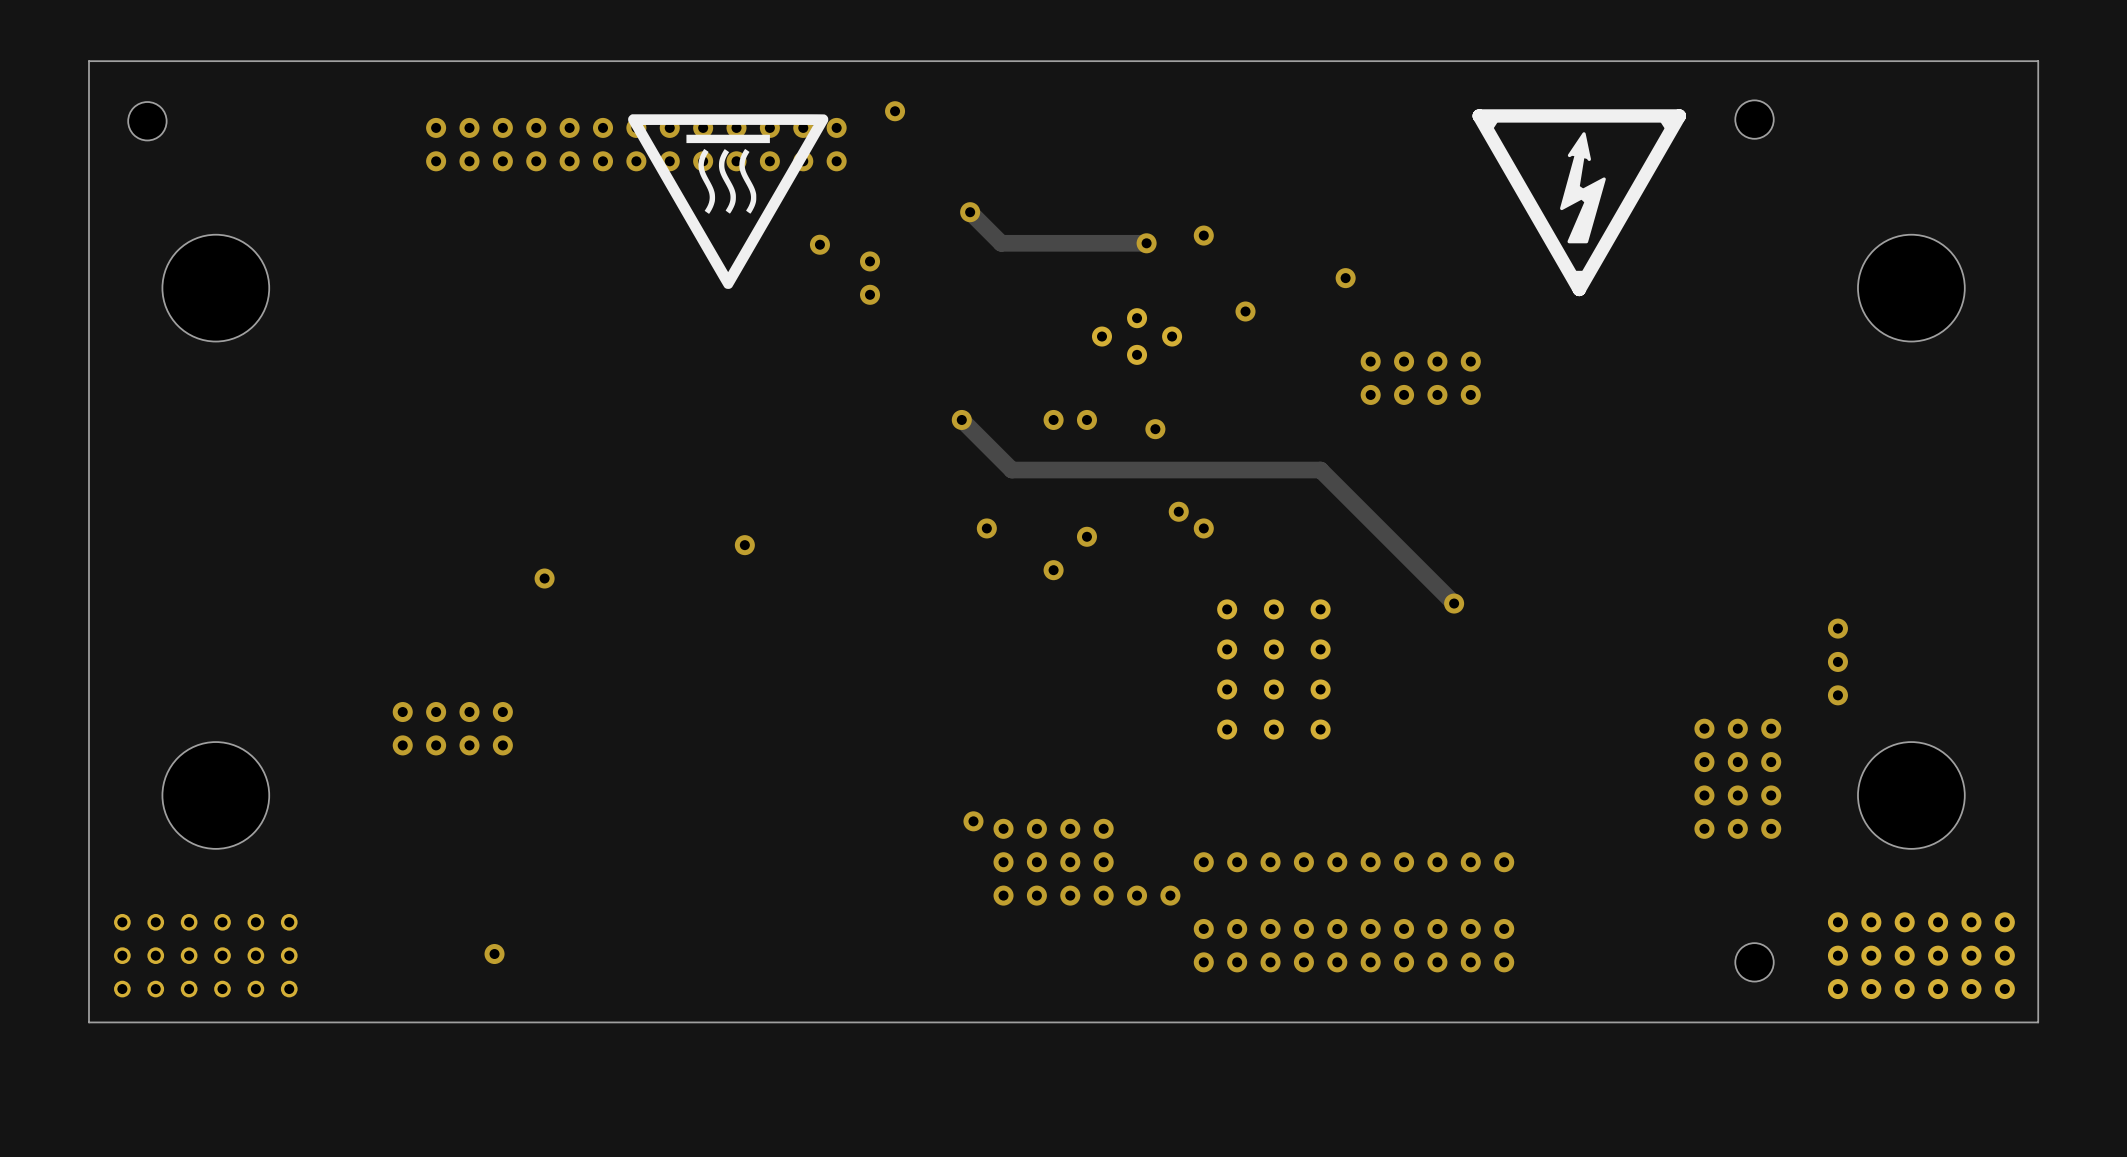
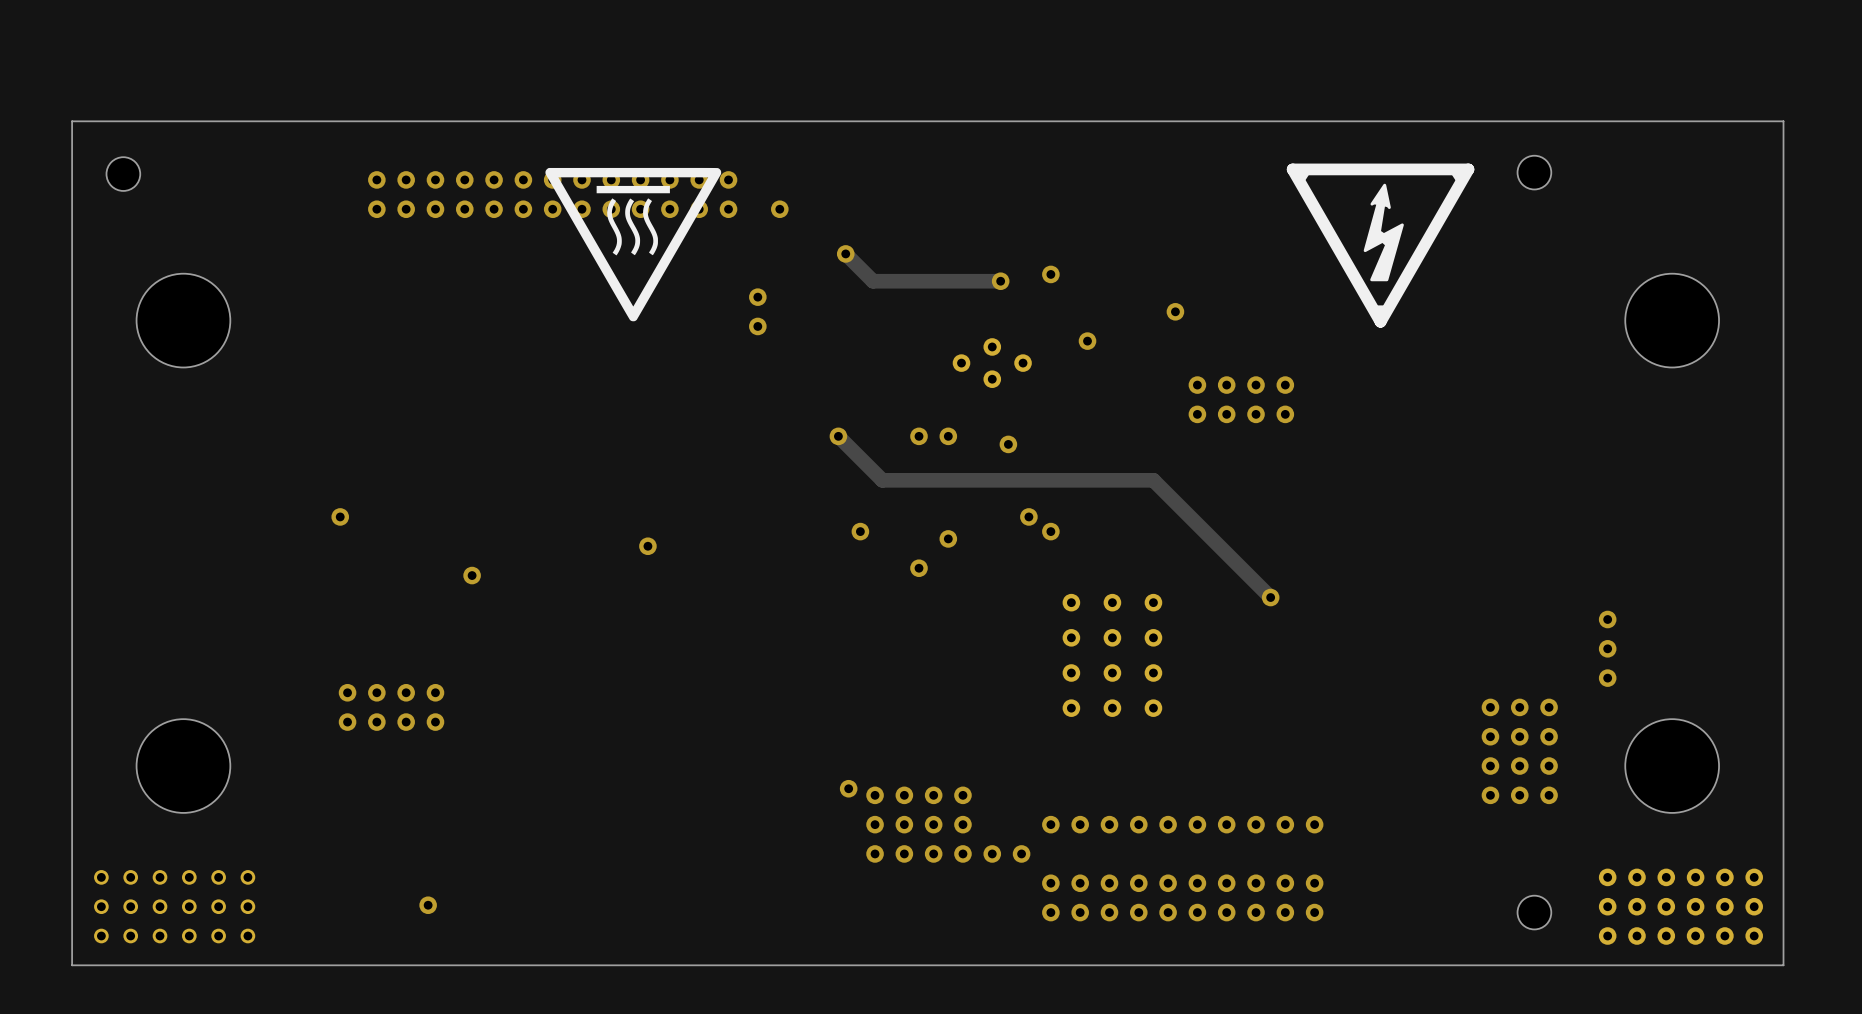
via position: (895, 111) -> (779, 209)
via: (819, 244) -> none
via: none -> (340, 516)

